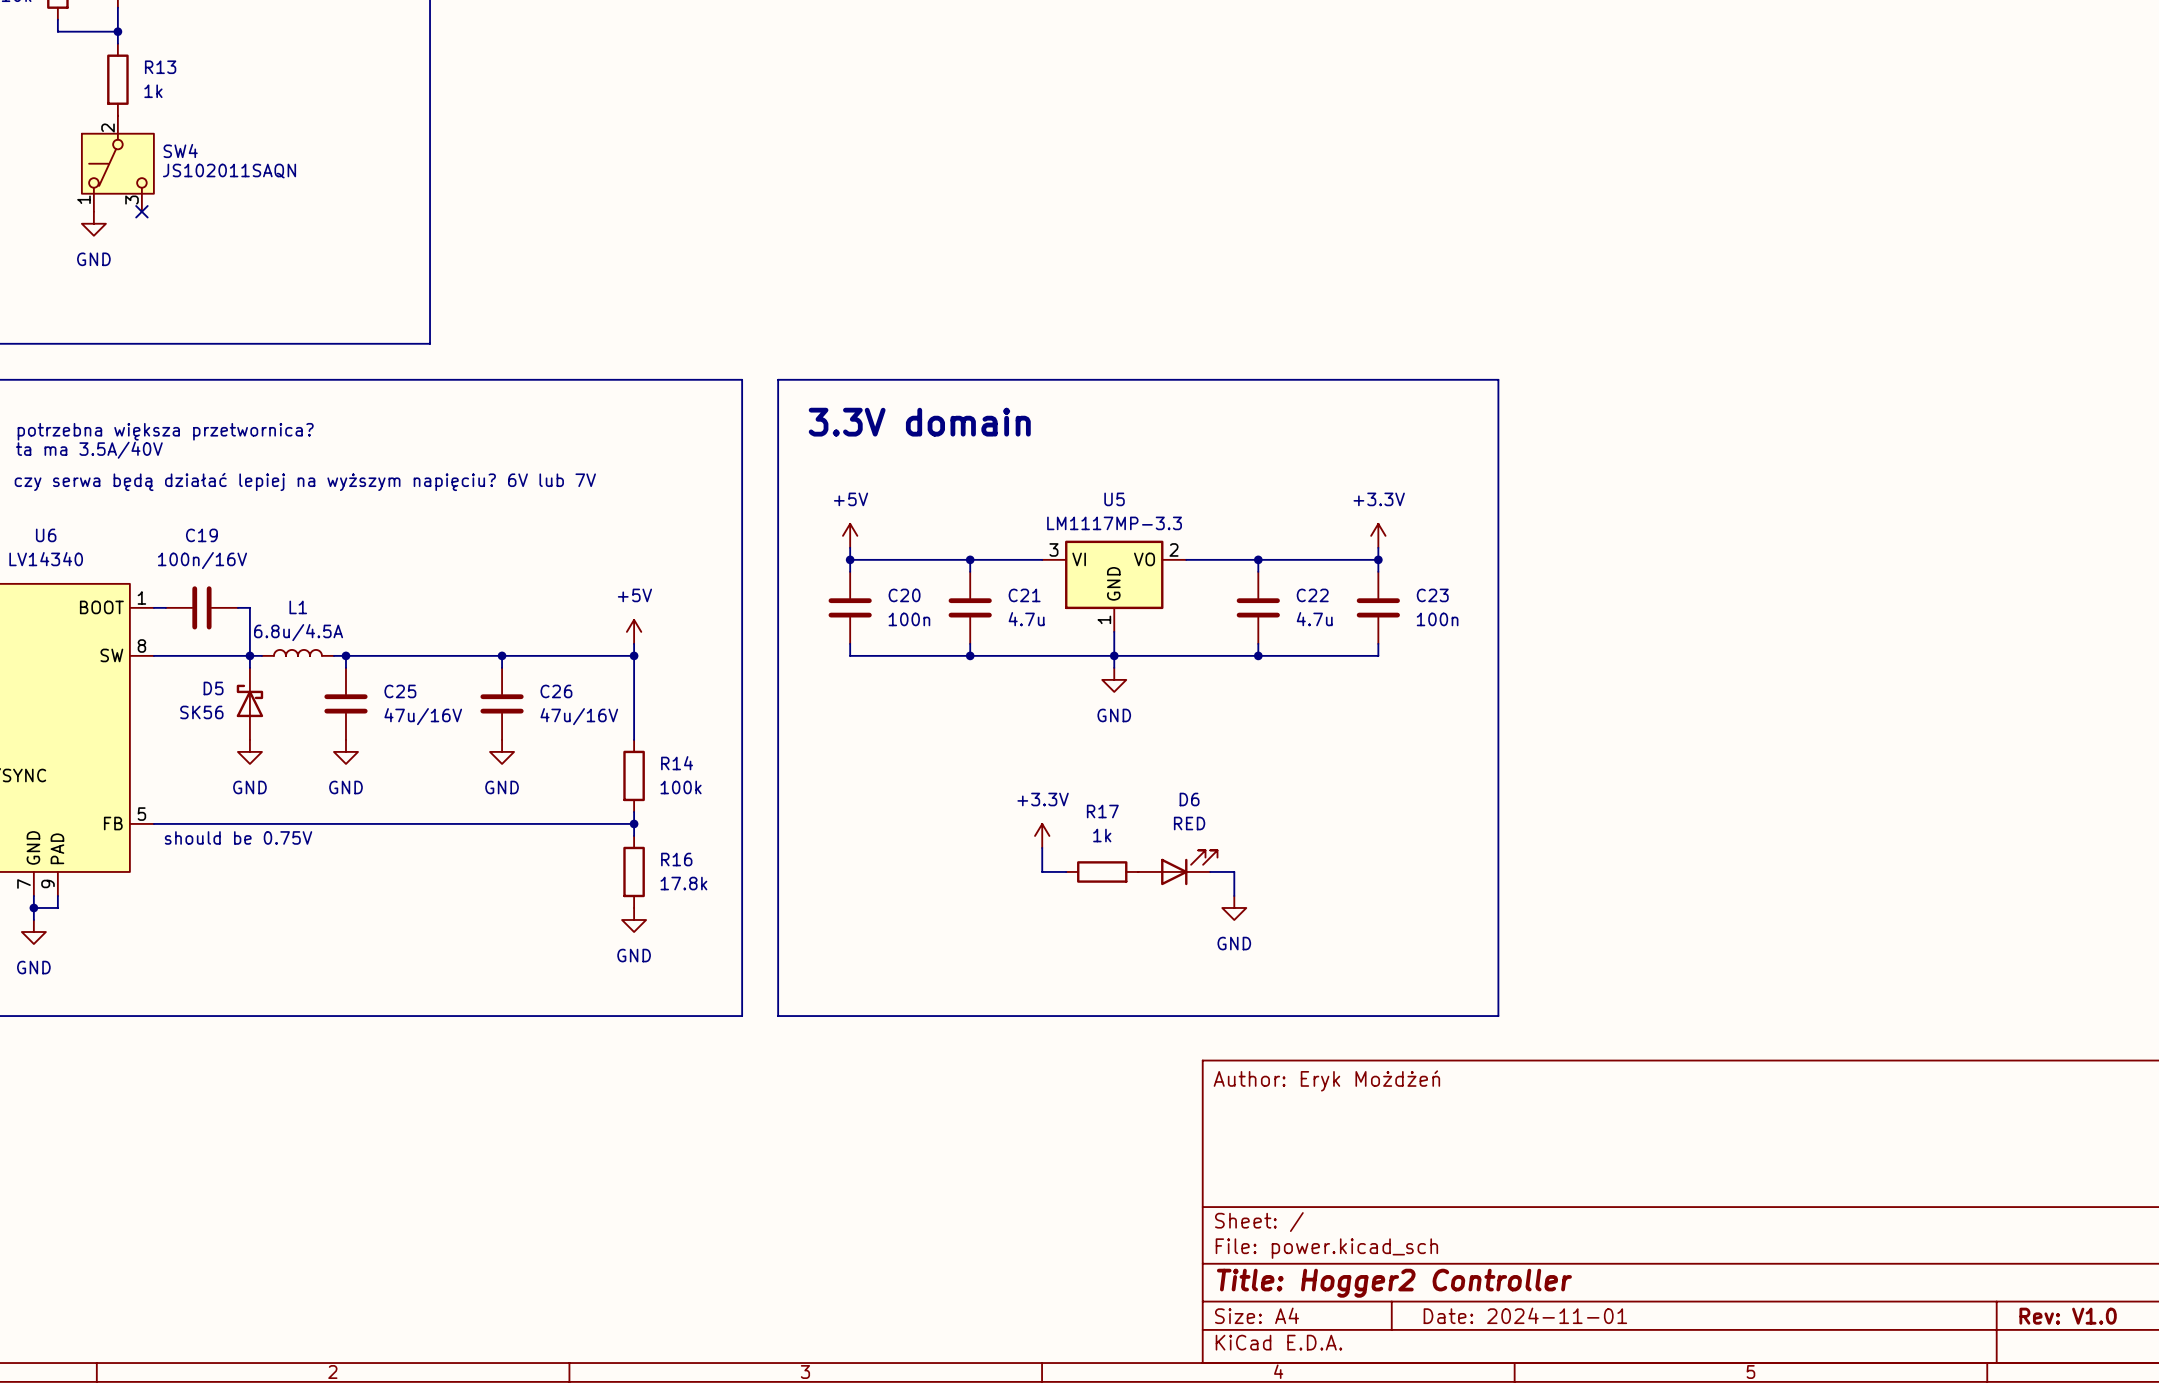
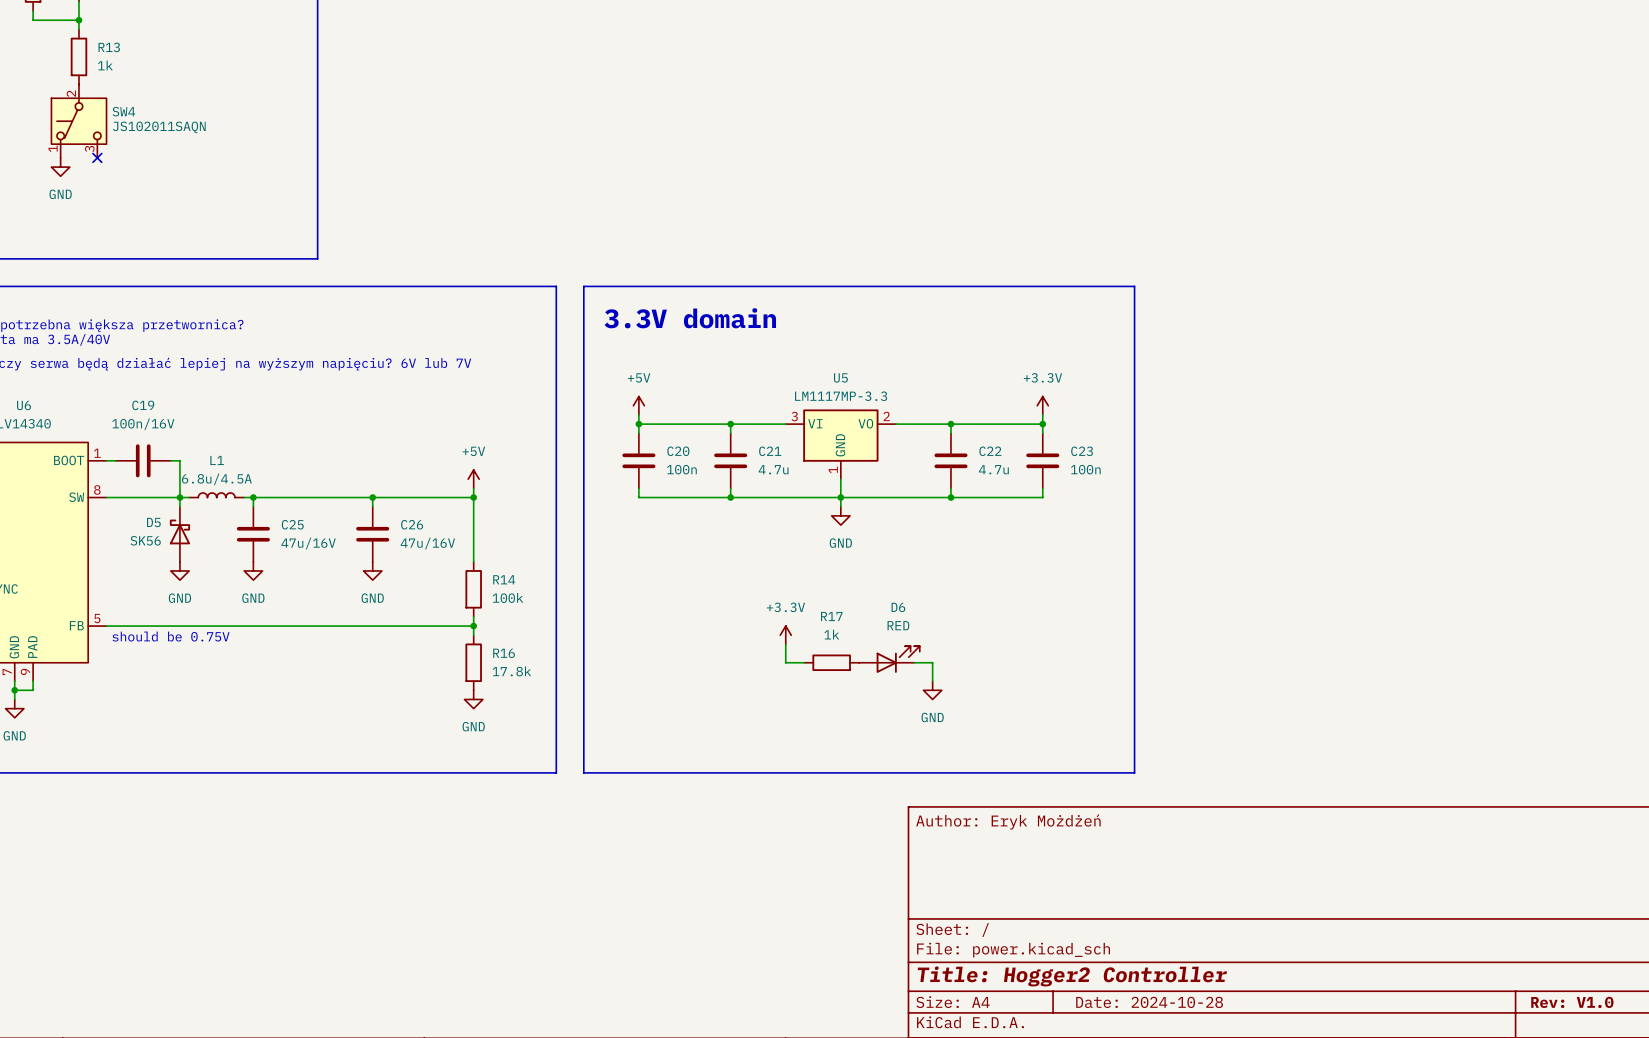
title block: Date: 2024-11-01 (1525, 1315) -> Date: 2024-10-28 (1149, 1002)

